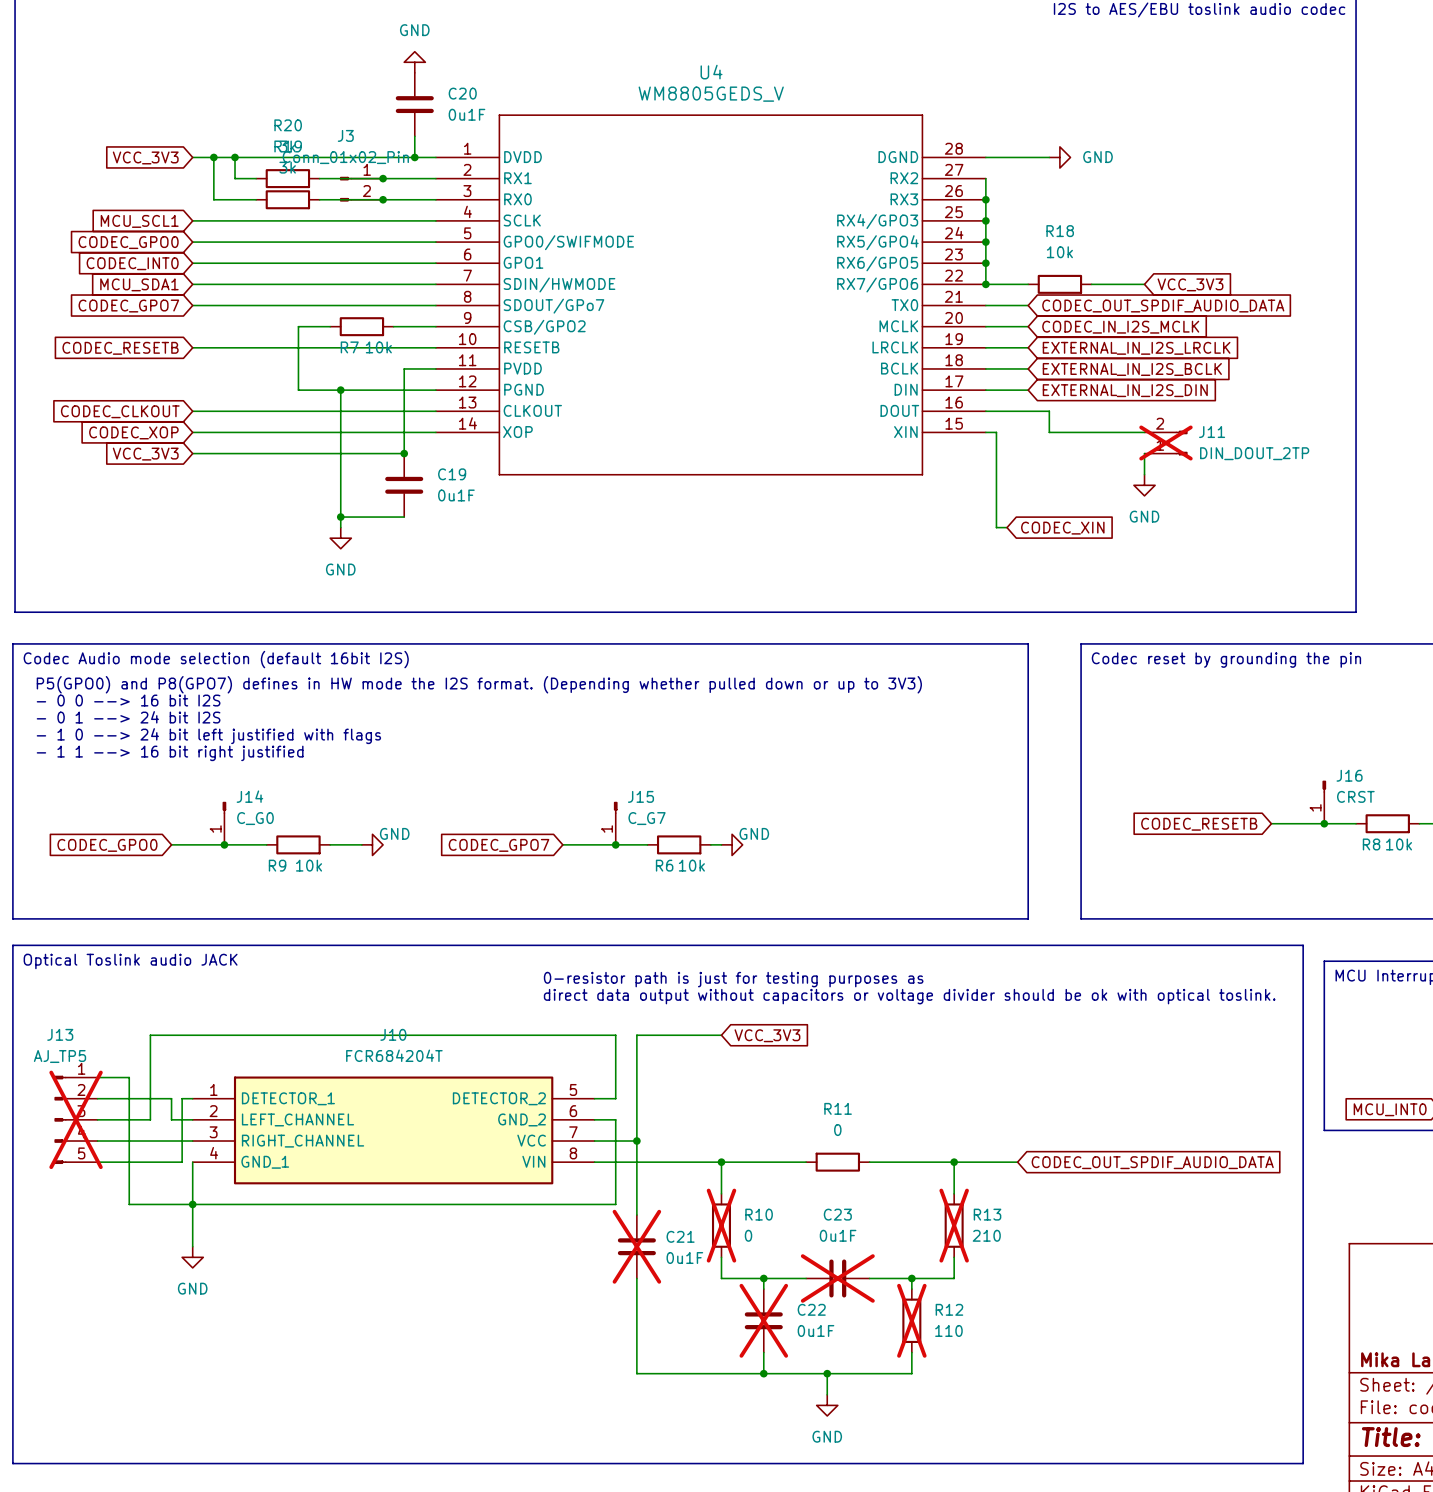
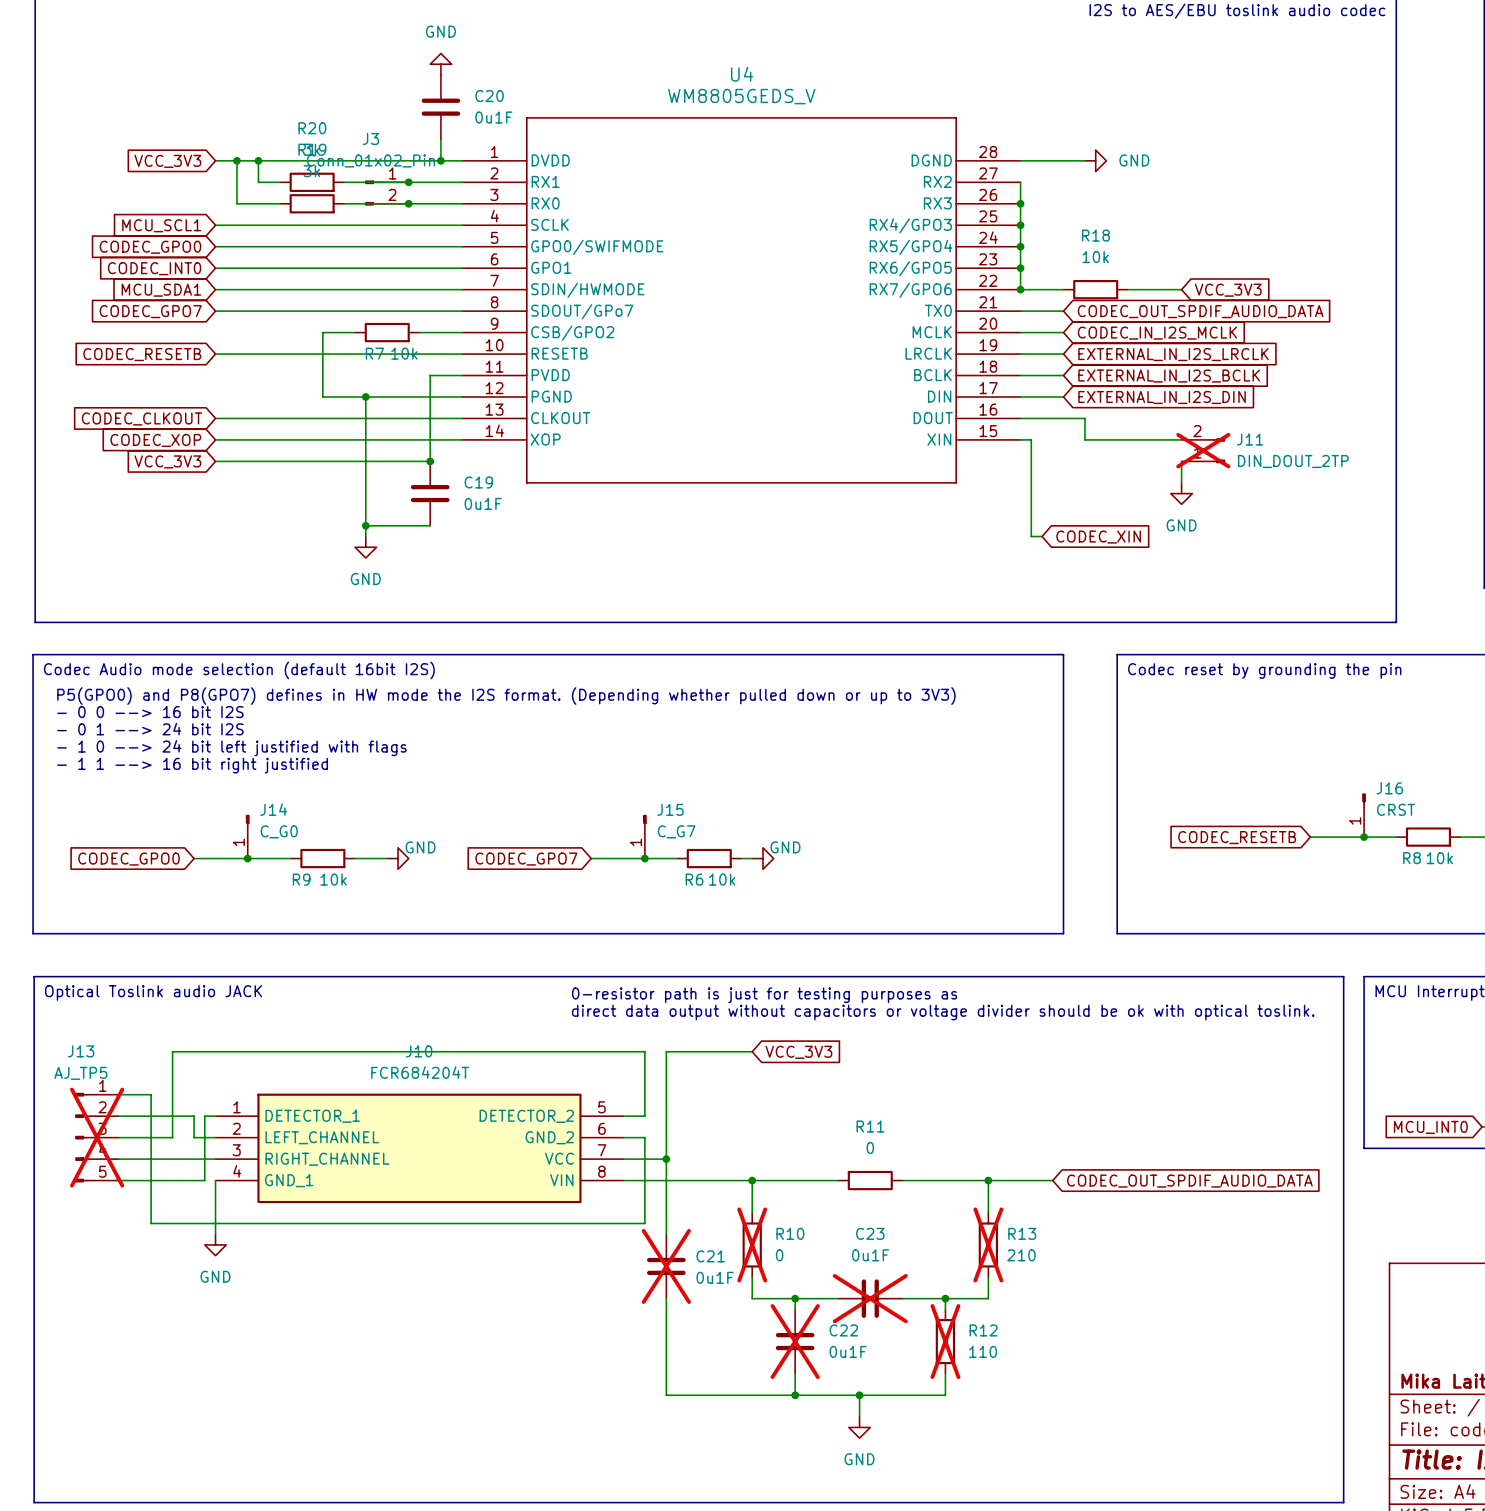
line: (12, 945) (1303, 945) (1303, 1463) (12, 1463) (12, 945) -> (34, 976) (1343, 976) (1343, 1502) (34, 1502) (34, 976)
text position: Optical Toslink audio JACK (130, 961) -> Optical Toslink audio JACK (153, 992)
junction: (192, 1204) -> none
wire: (192, 1215) (192, 1246) -> none
power symbol position: GND (192, 1257) -> GND (215, 1244)

